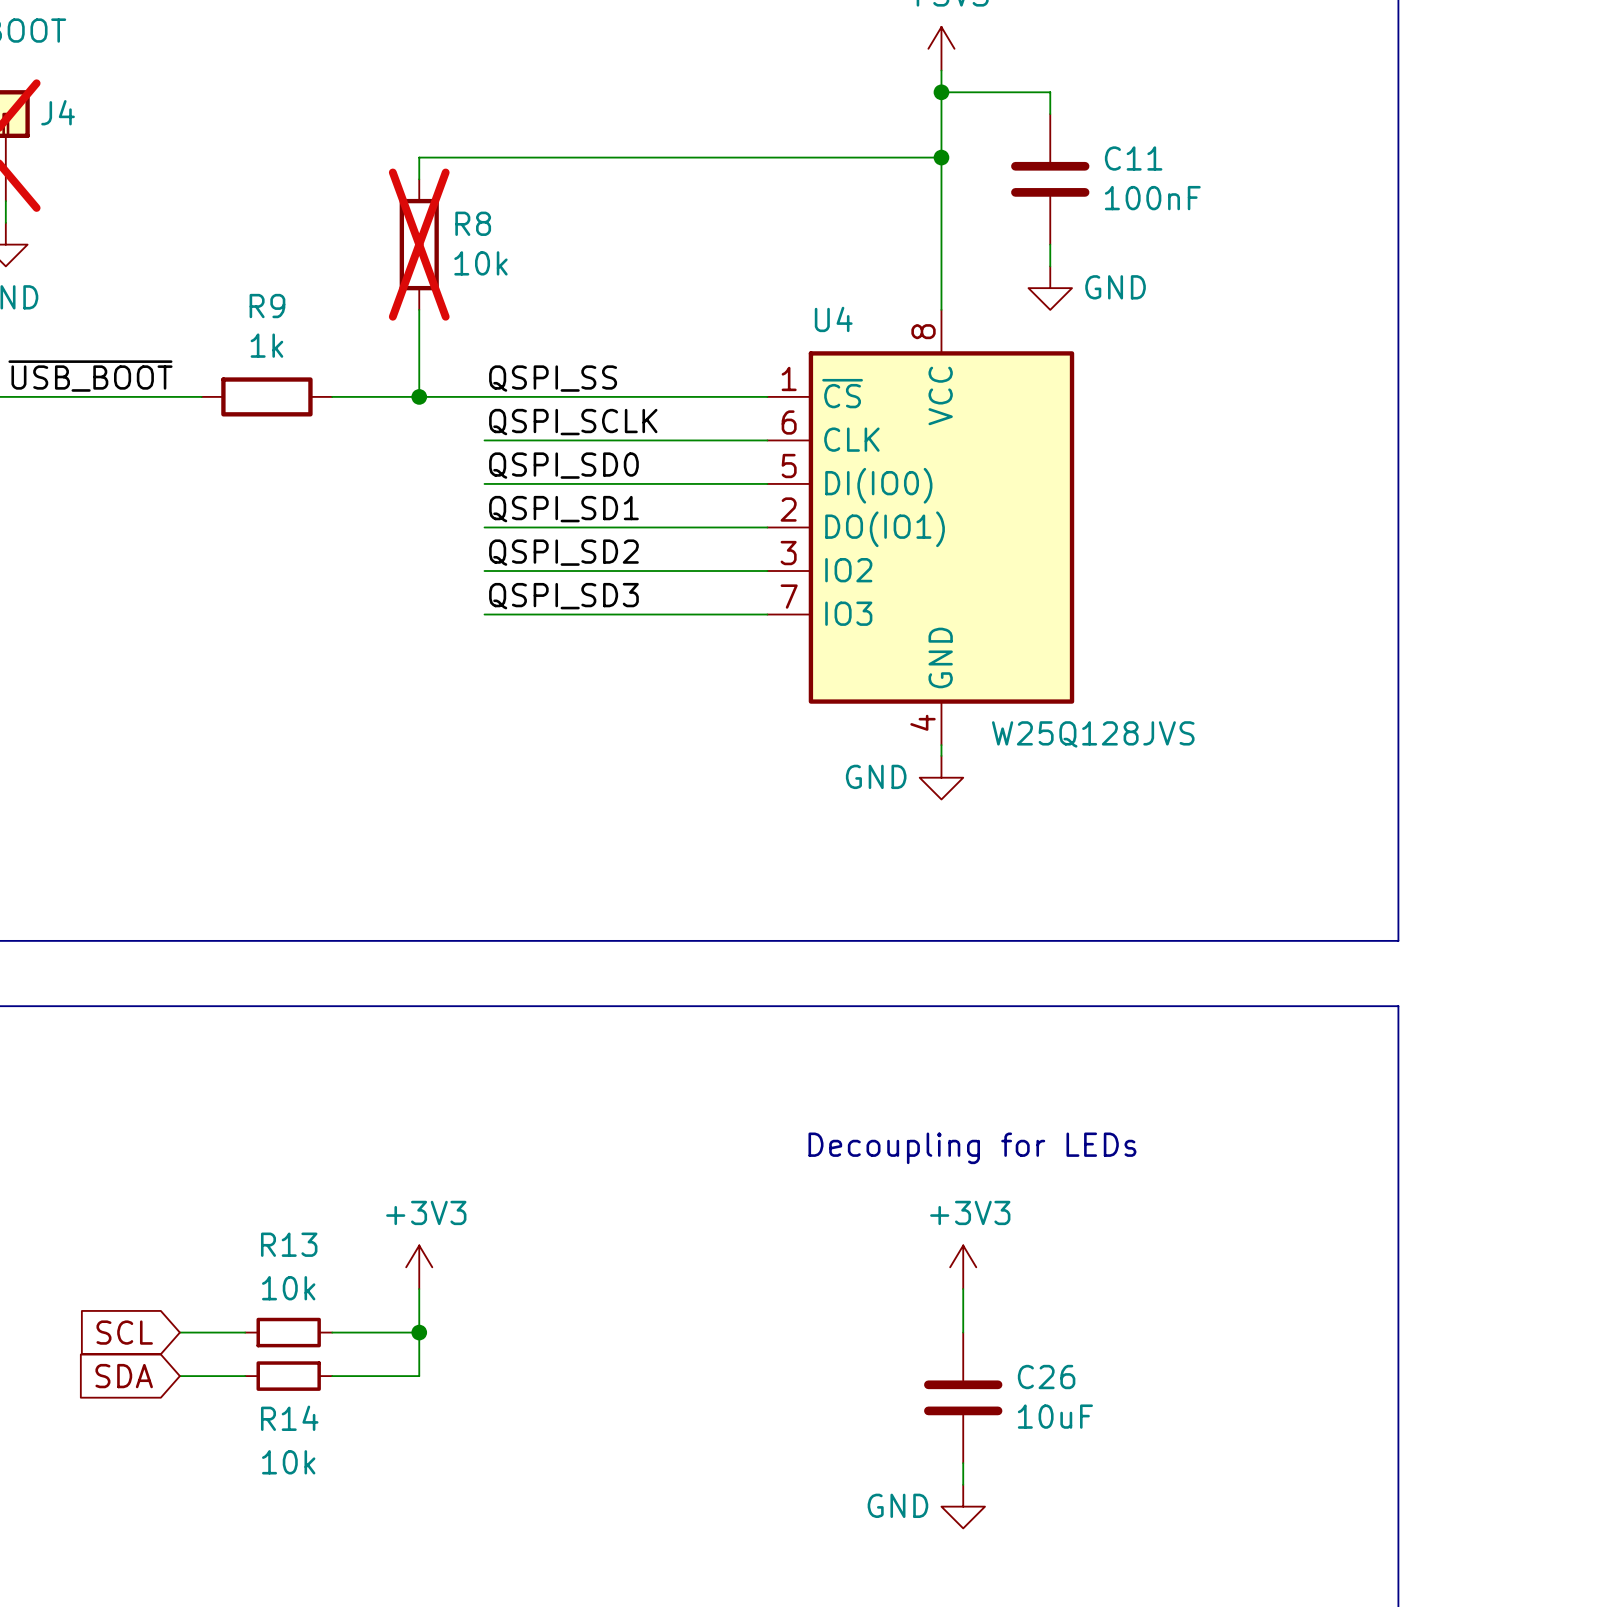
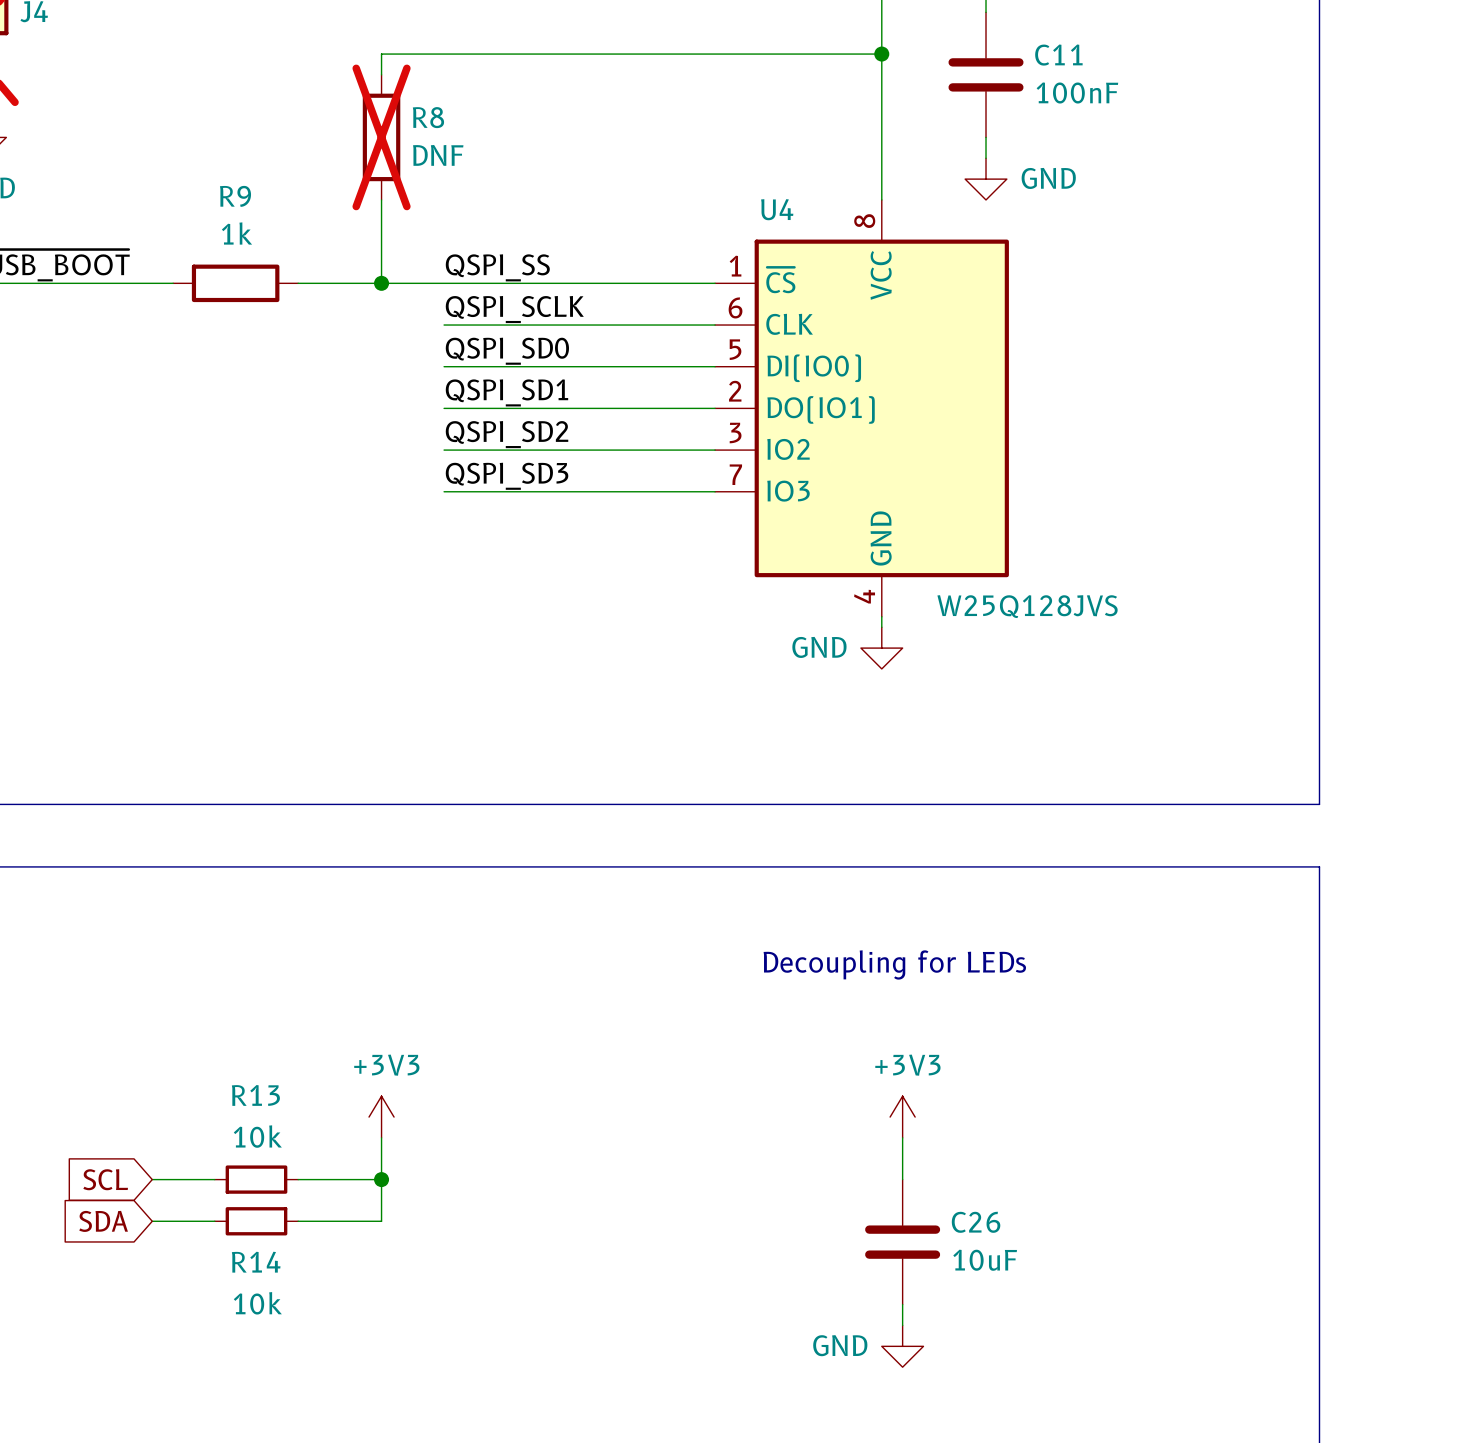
R8 value: 10k (480, 263) -> DNF (438, 155)
text position: Decoupling for LEDs (972, 1148) -> Decoupling for LEDs (894, 964)

